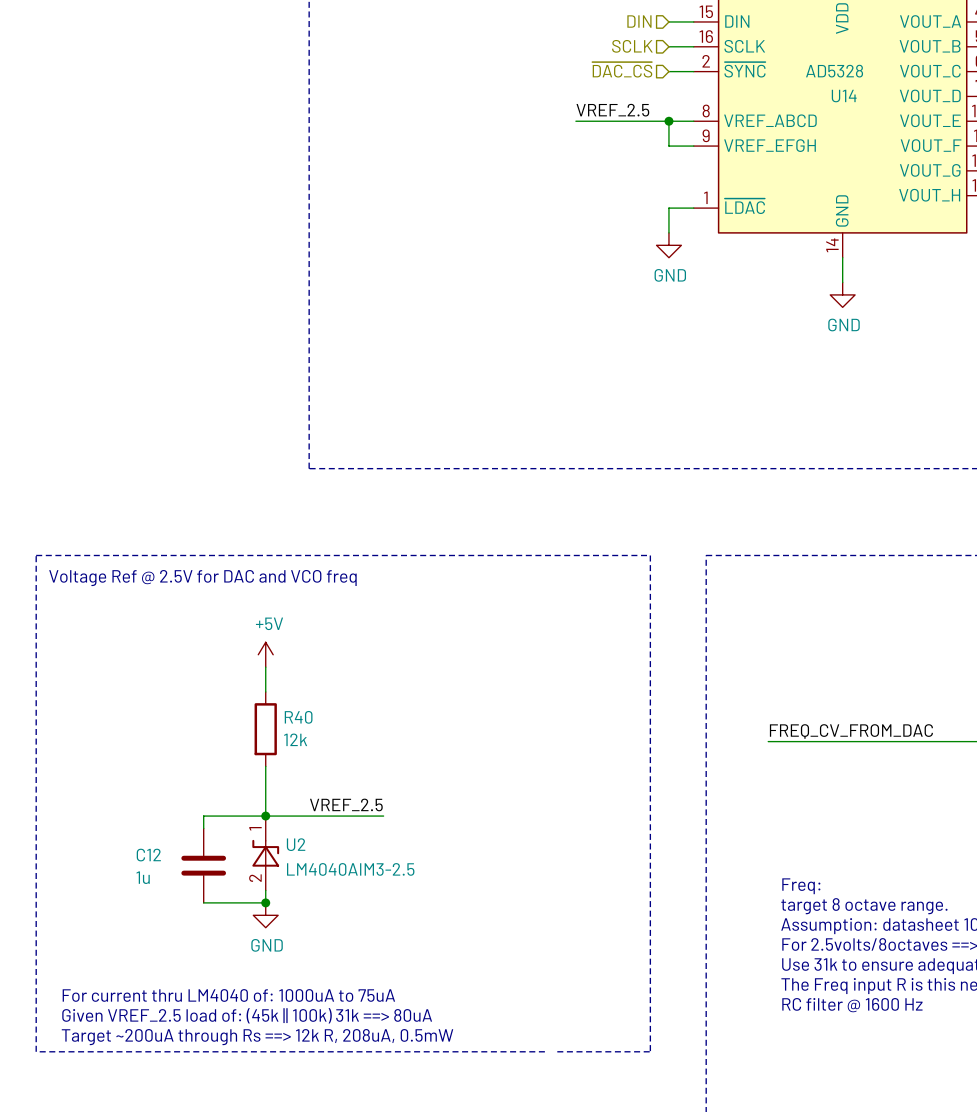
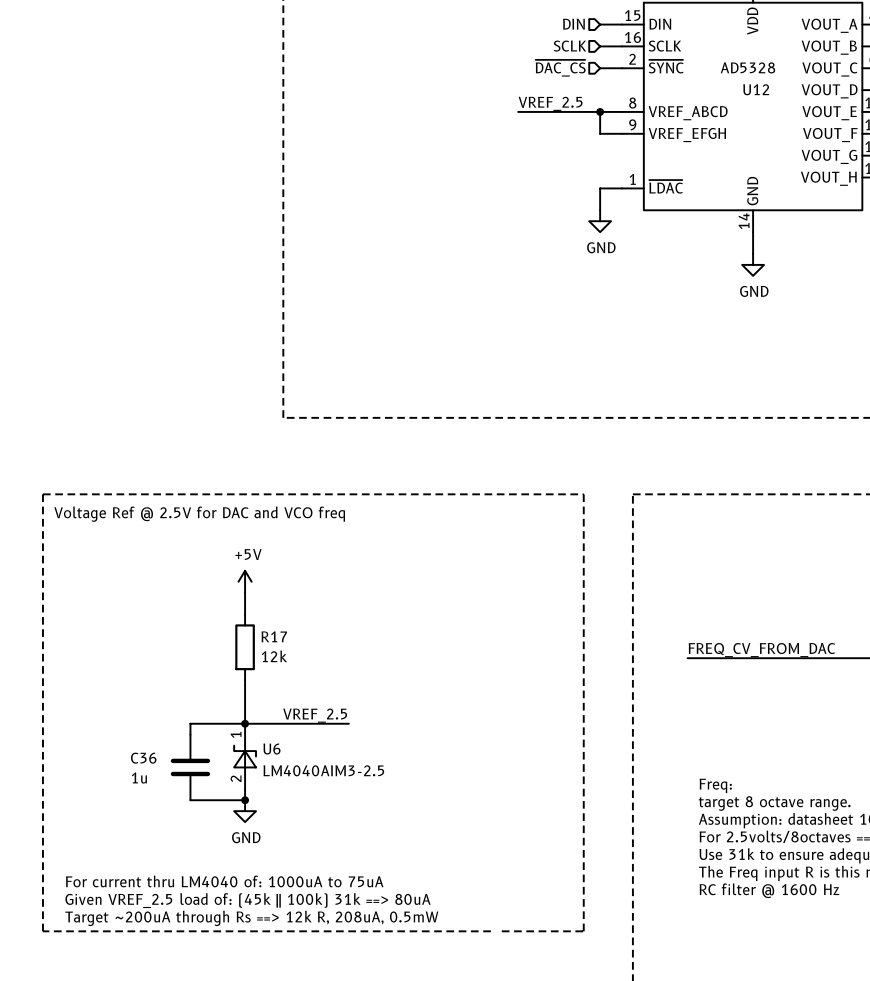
U14 name: U14 (844, 96) -> U12 (756, 89)
R40 name: R40 (298, 717) -> R17 (274, 636)
U2 name: U2 (296, 844) -> U6 (271, 749)
C12 name: C12 (148, 855) -> C36 (143, 758)

